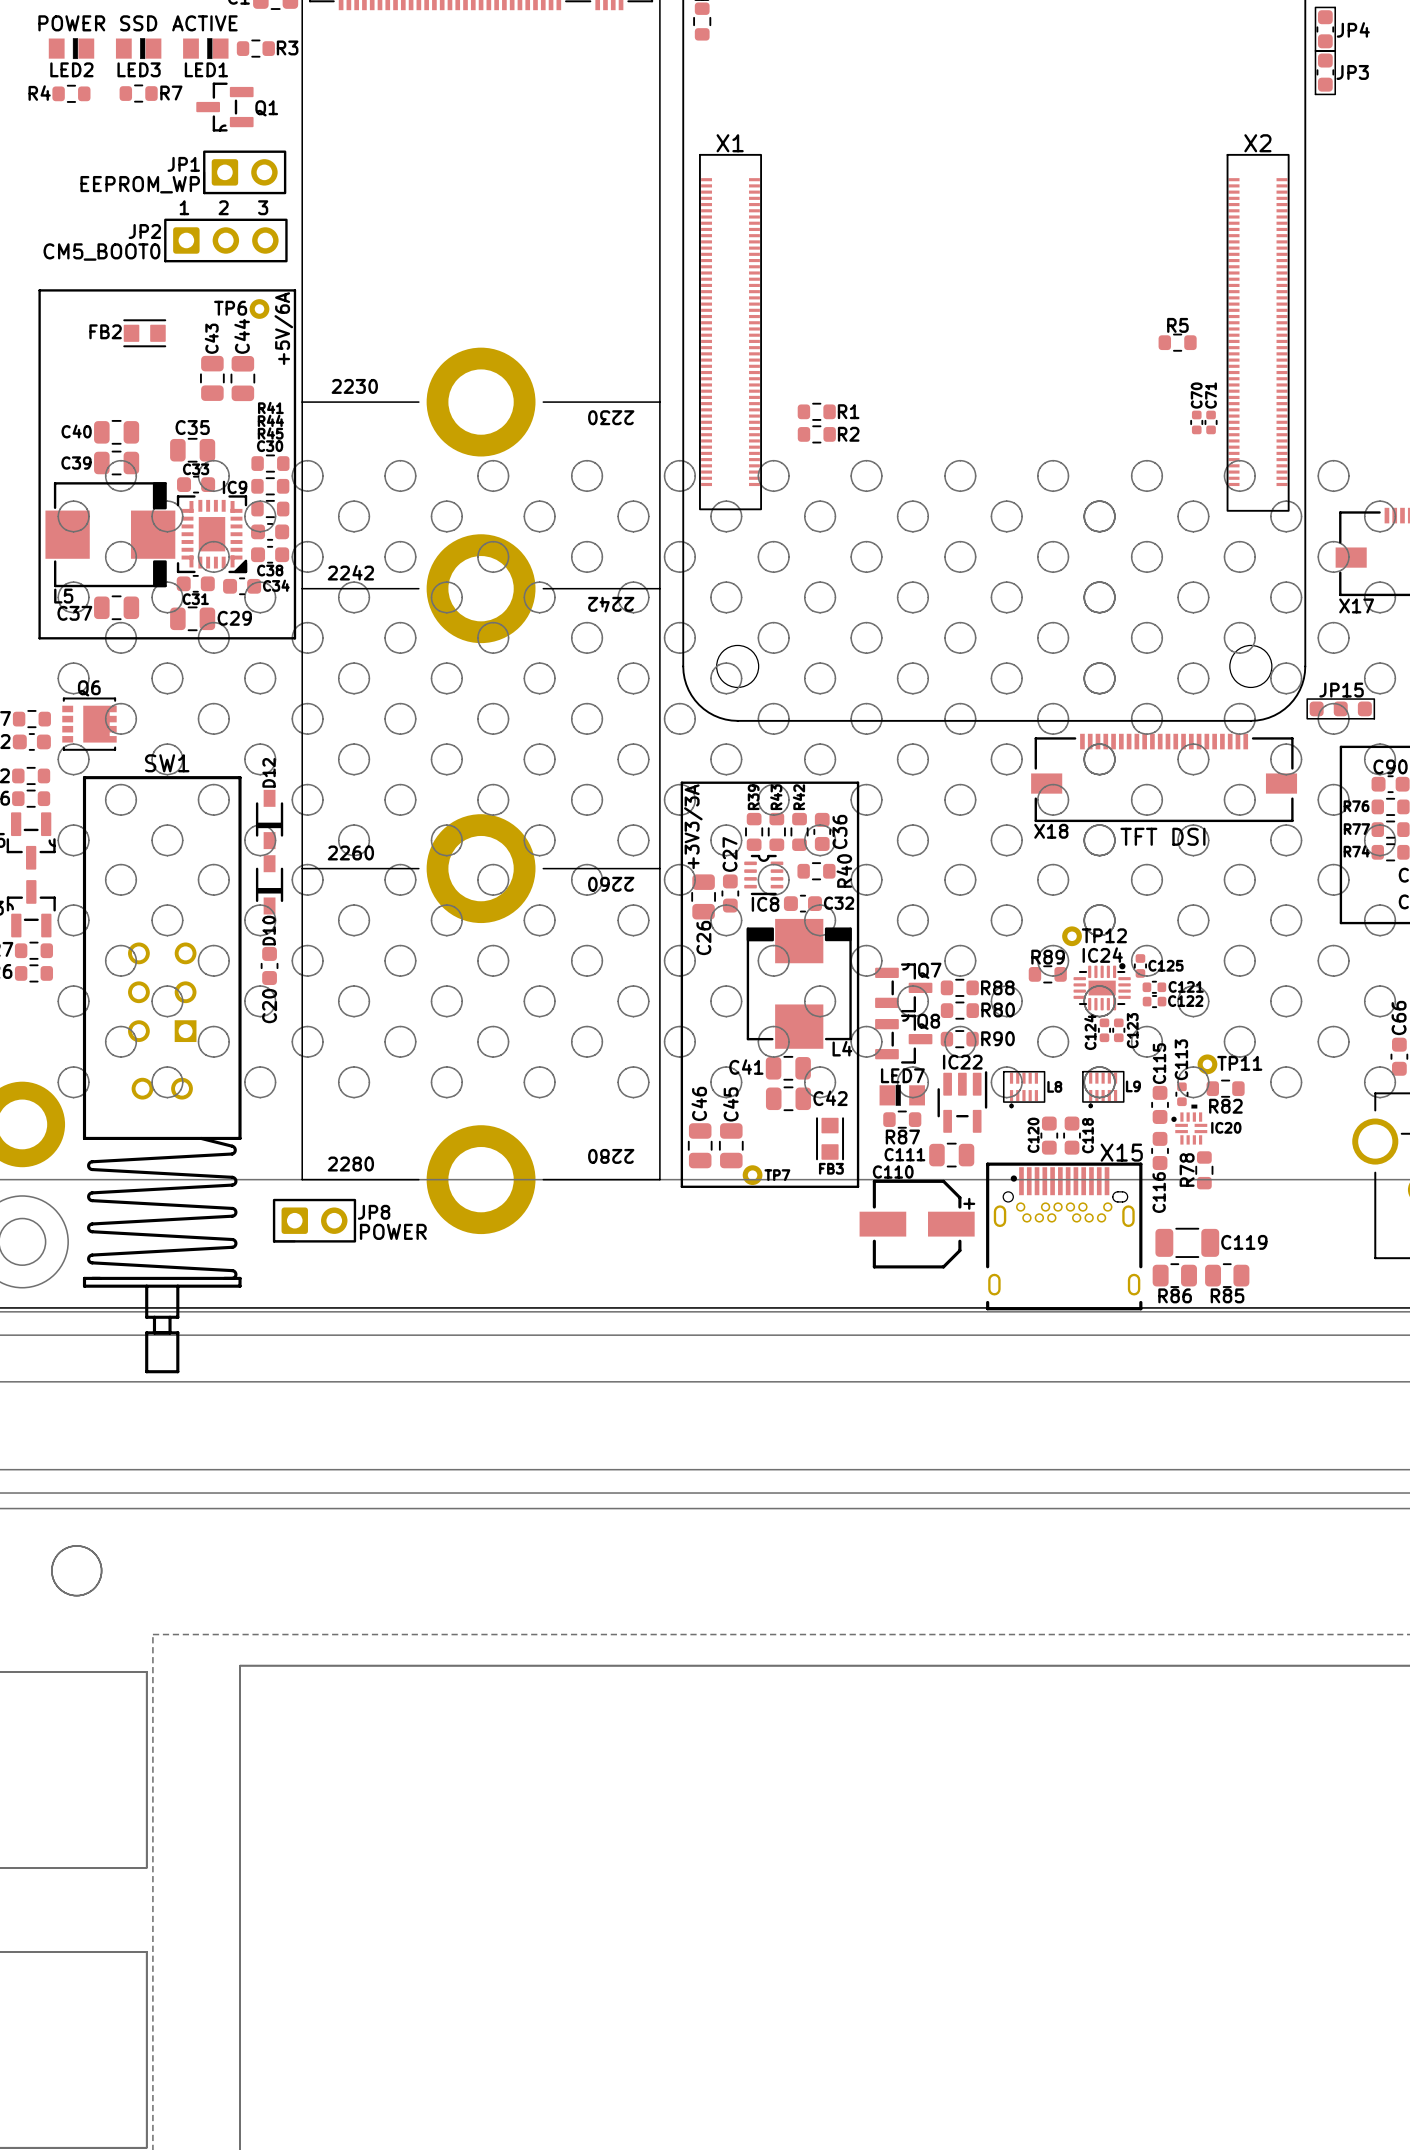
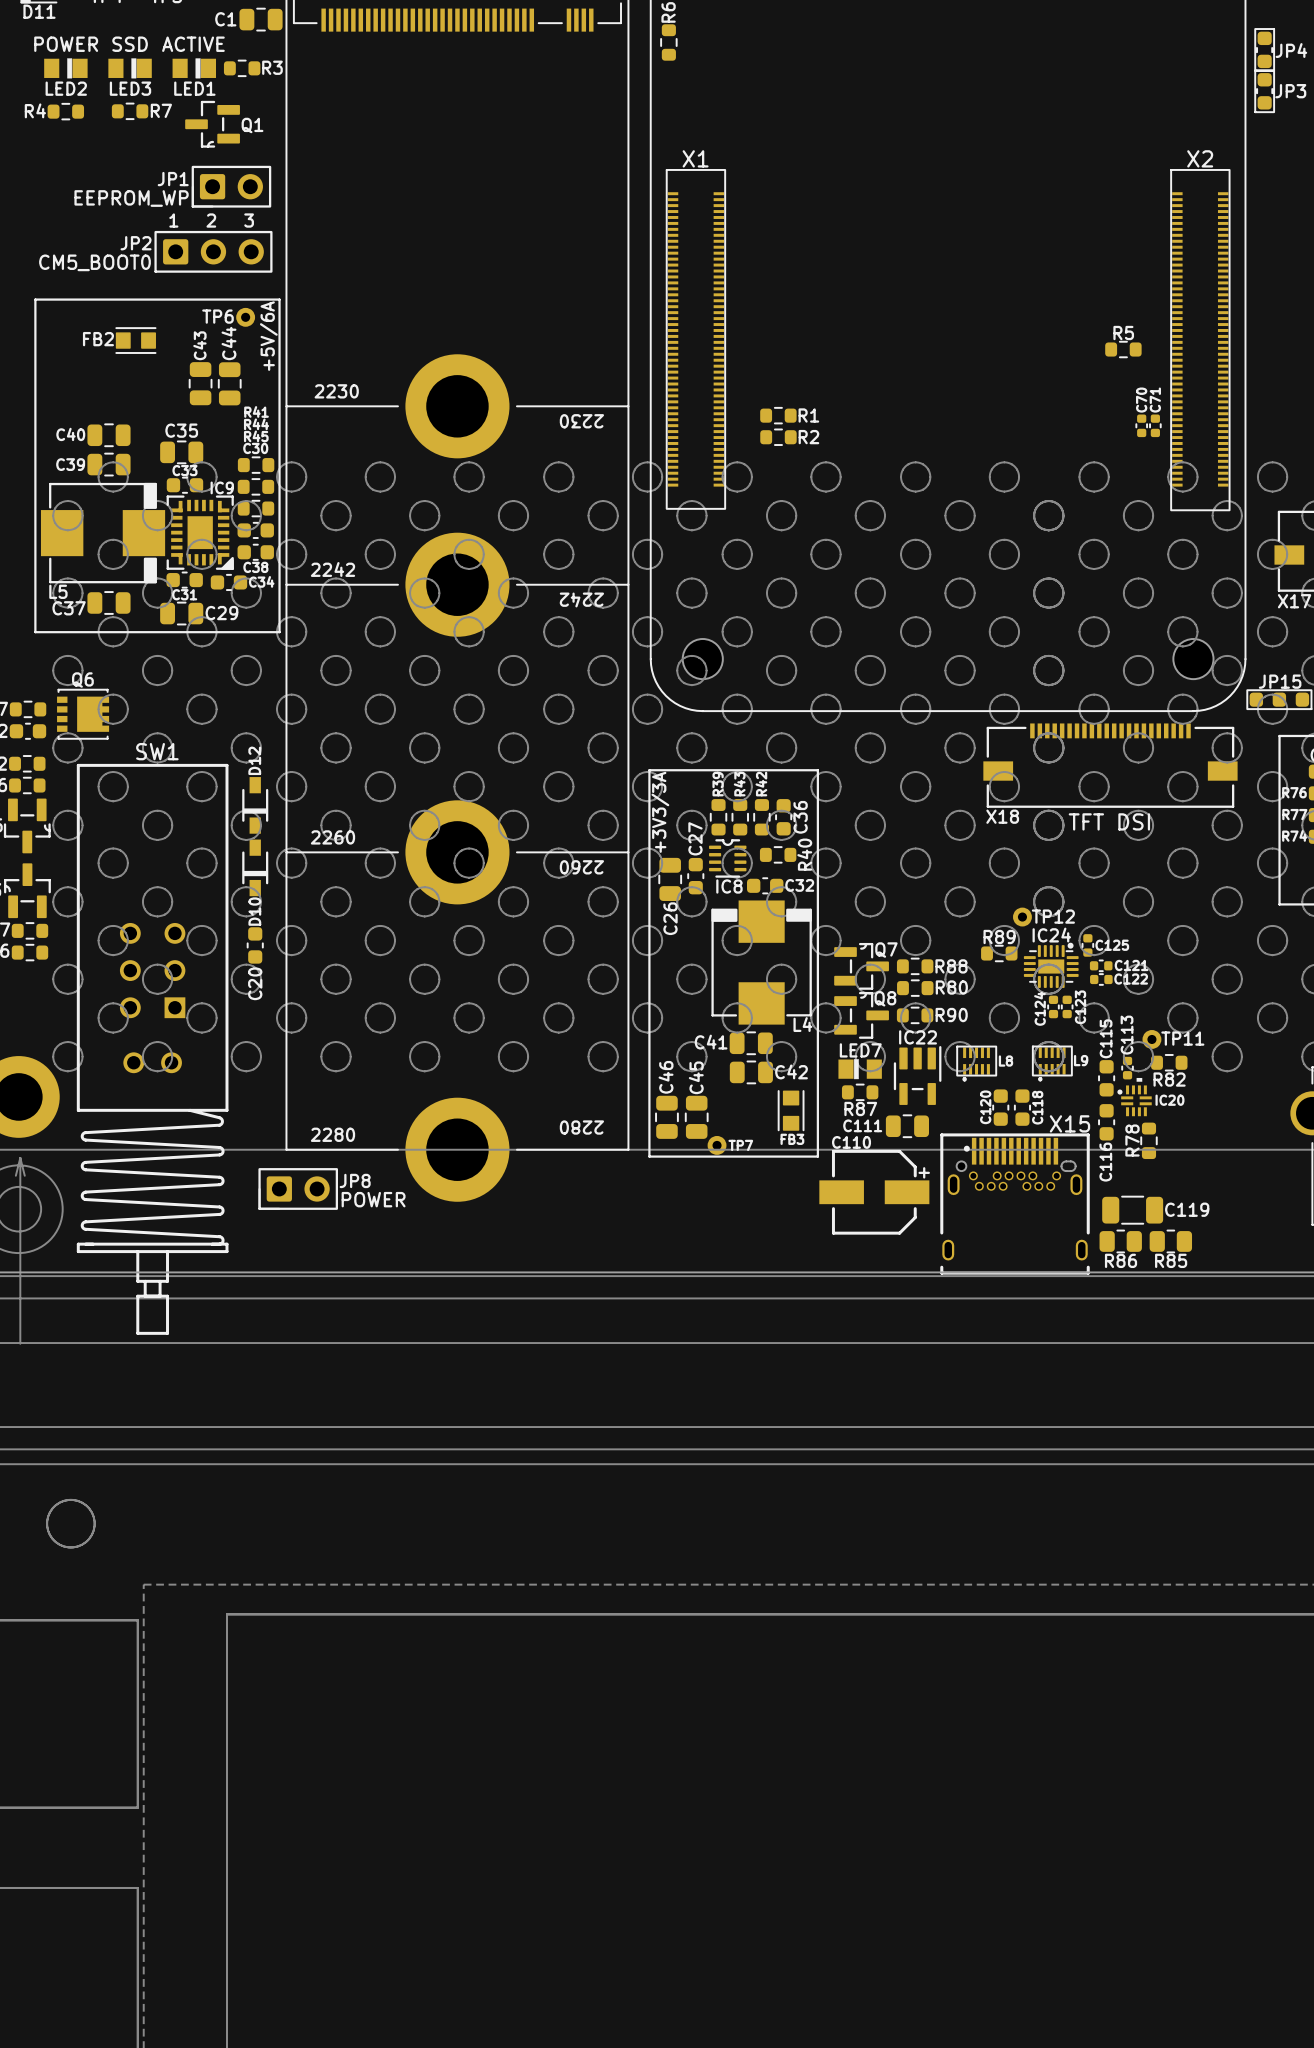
line: none -> (20, 1157) (15, 1175)
line: none -> (20, 1157) (20, 1343)
line: none -> (20, 1157) (24, 1175)

